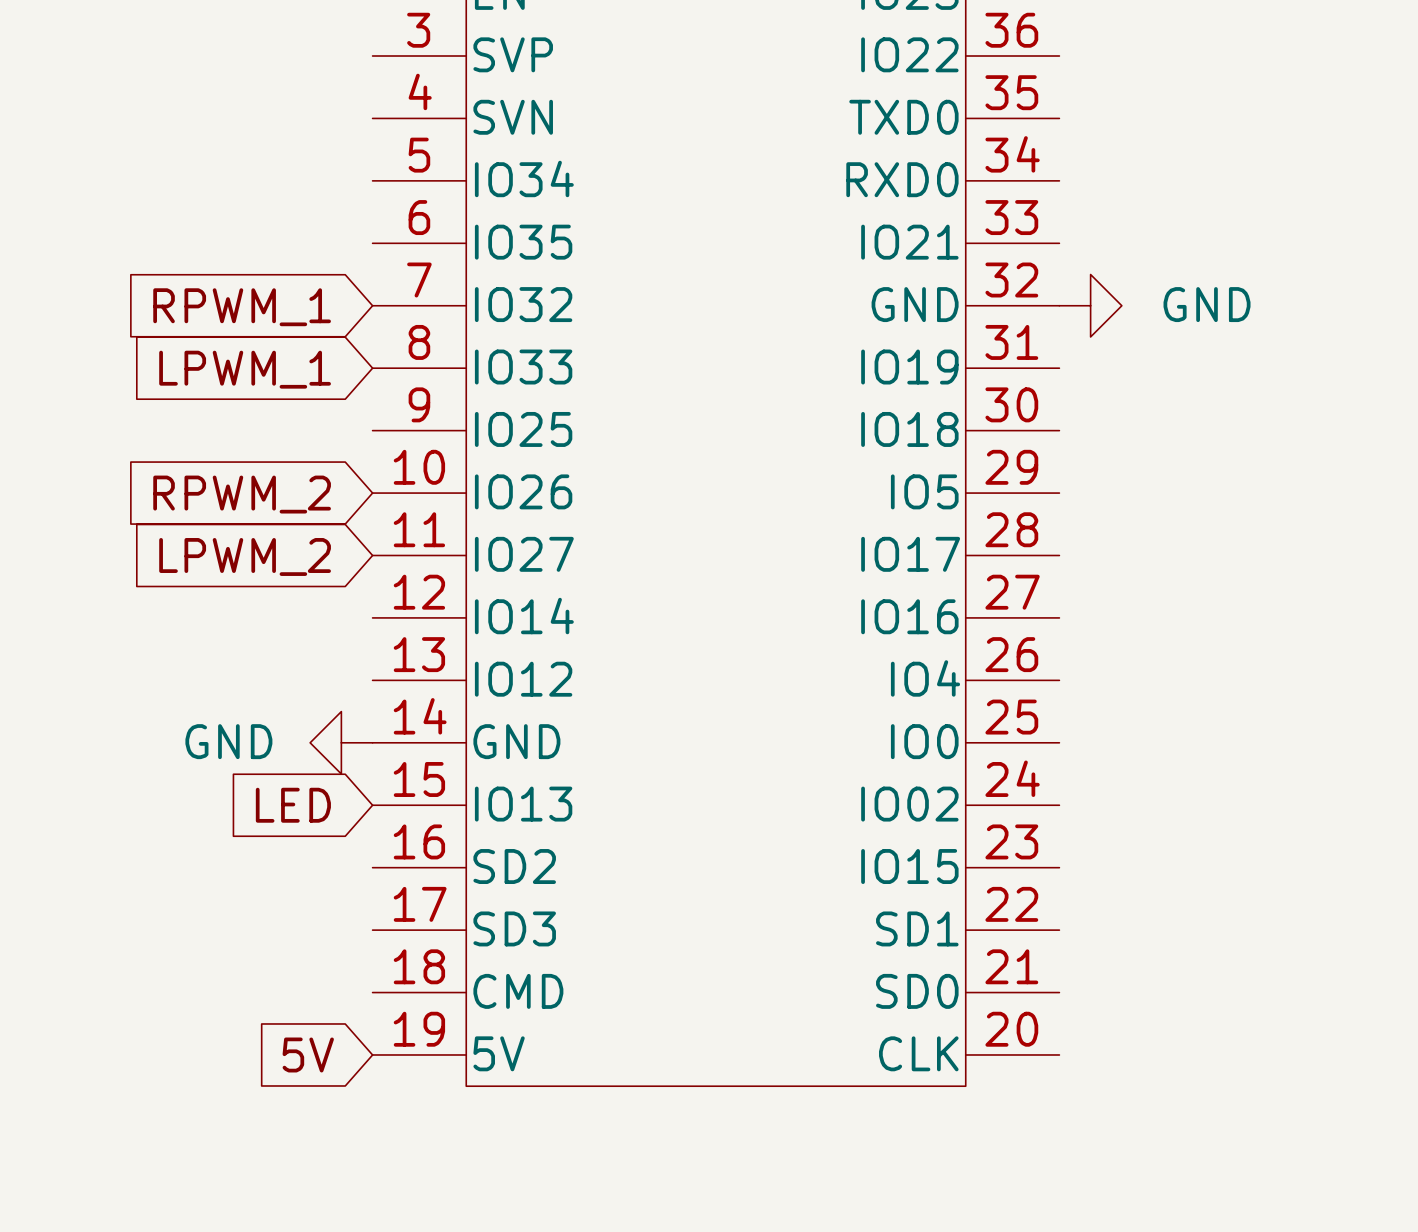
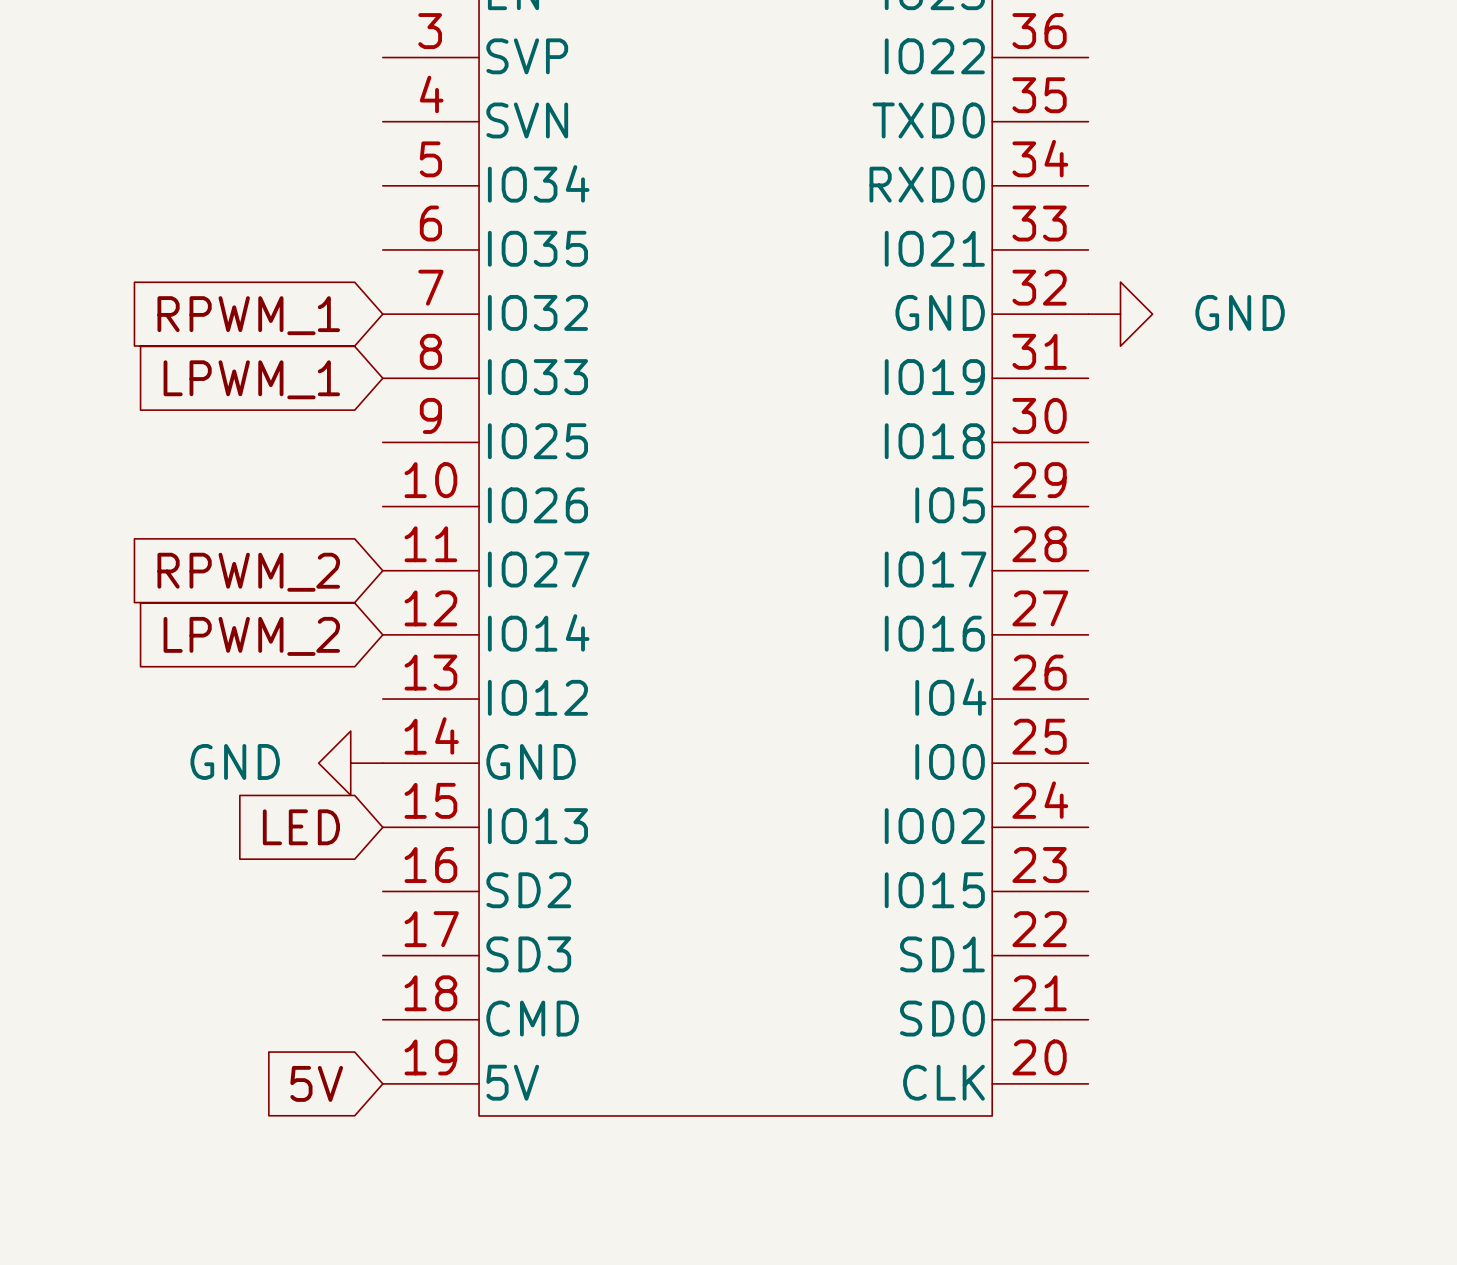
global label: RPWM_2 (242, 494) -> none
global label: LPWM_2 (245, 556) -> RPWM_2 (248, 572)
global label: none -> LPWM_2 (251, 636)

